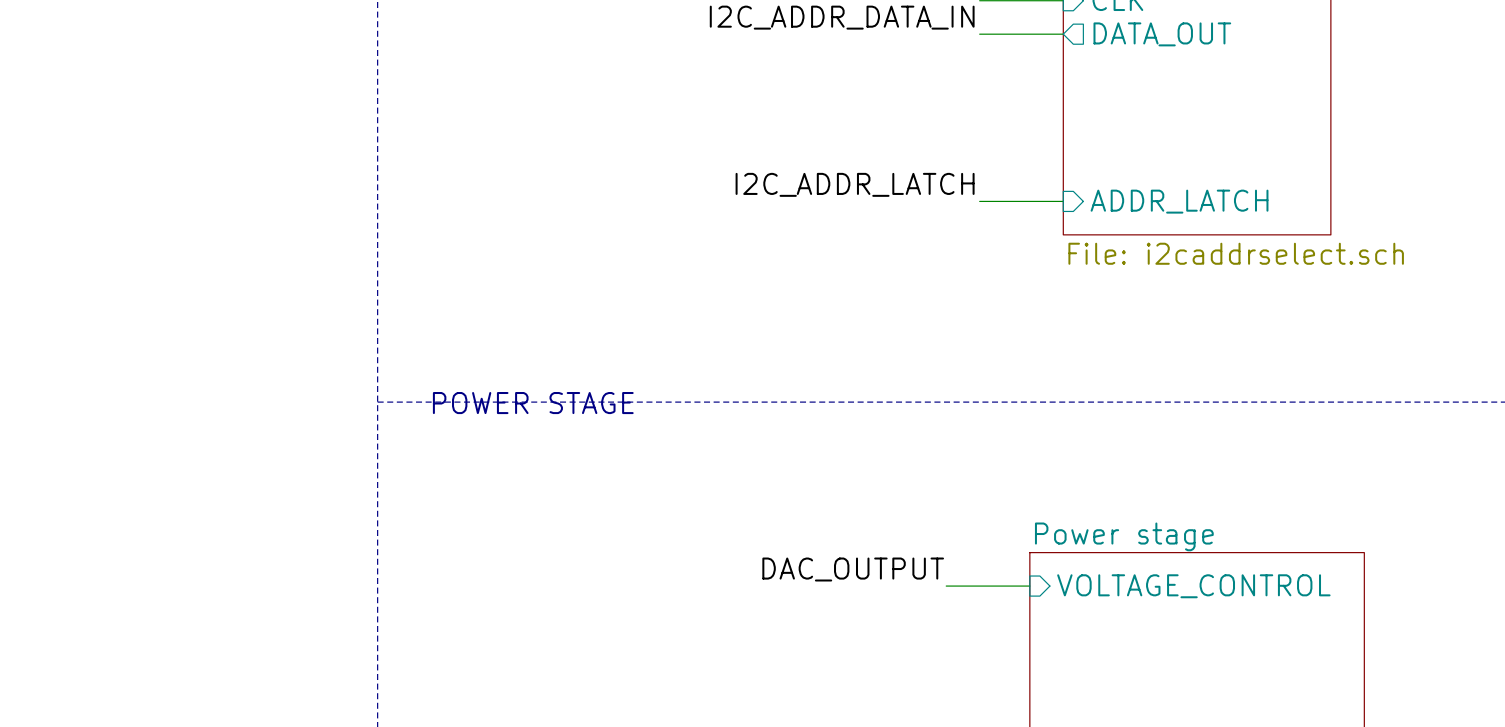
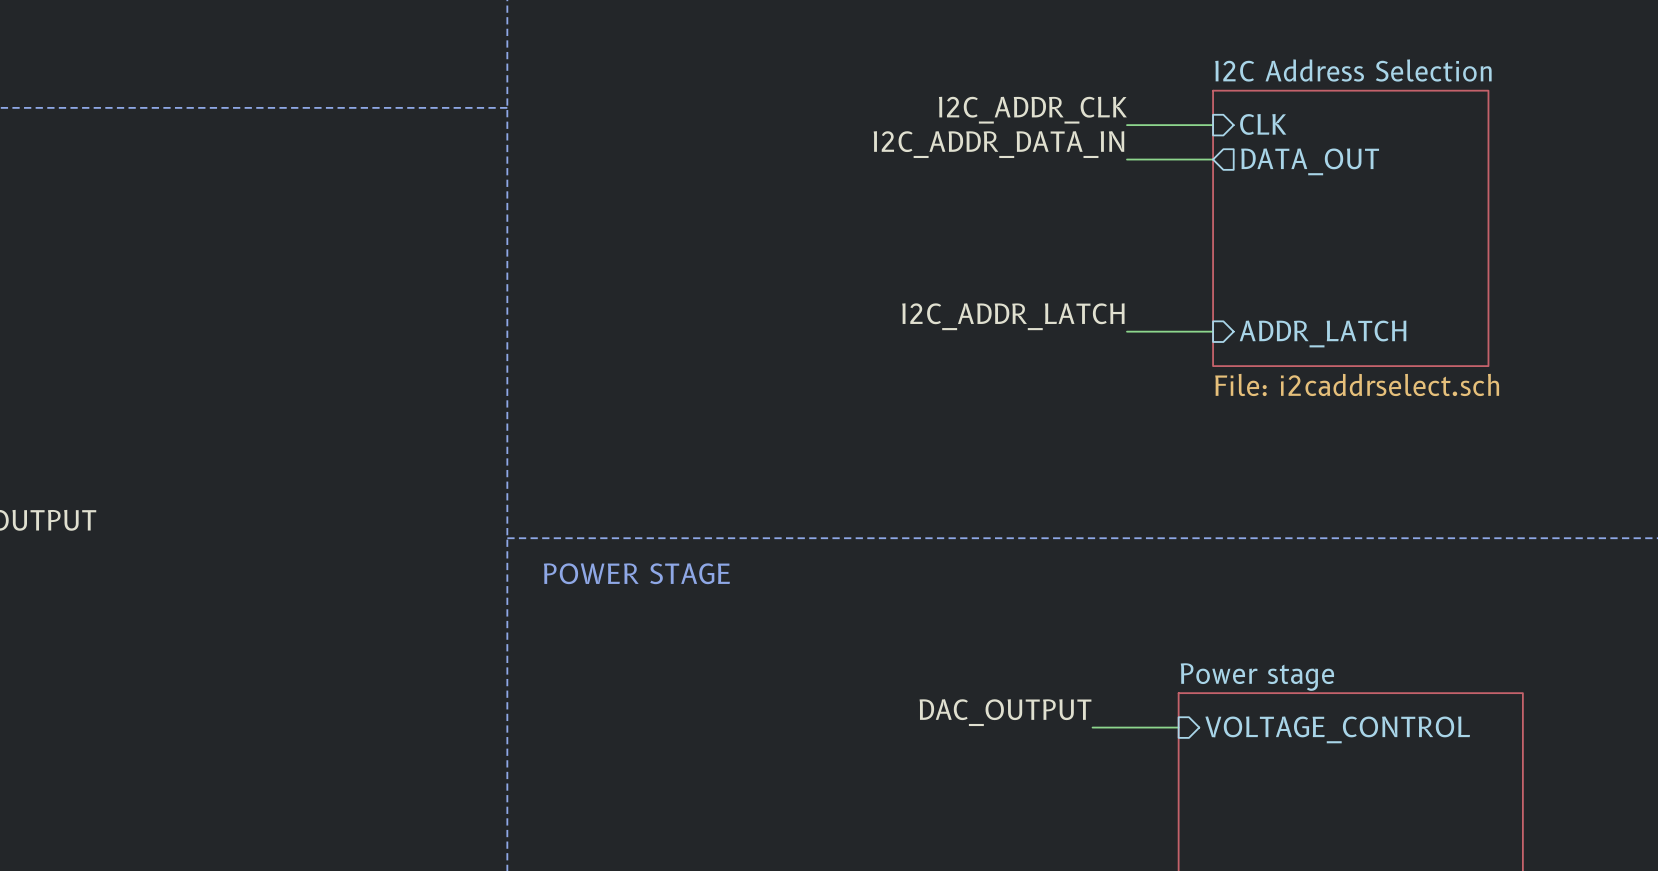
text position: POWER STAGE (533, 403) -> POWER STAGE (636, 573)

